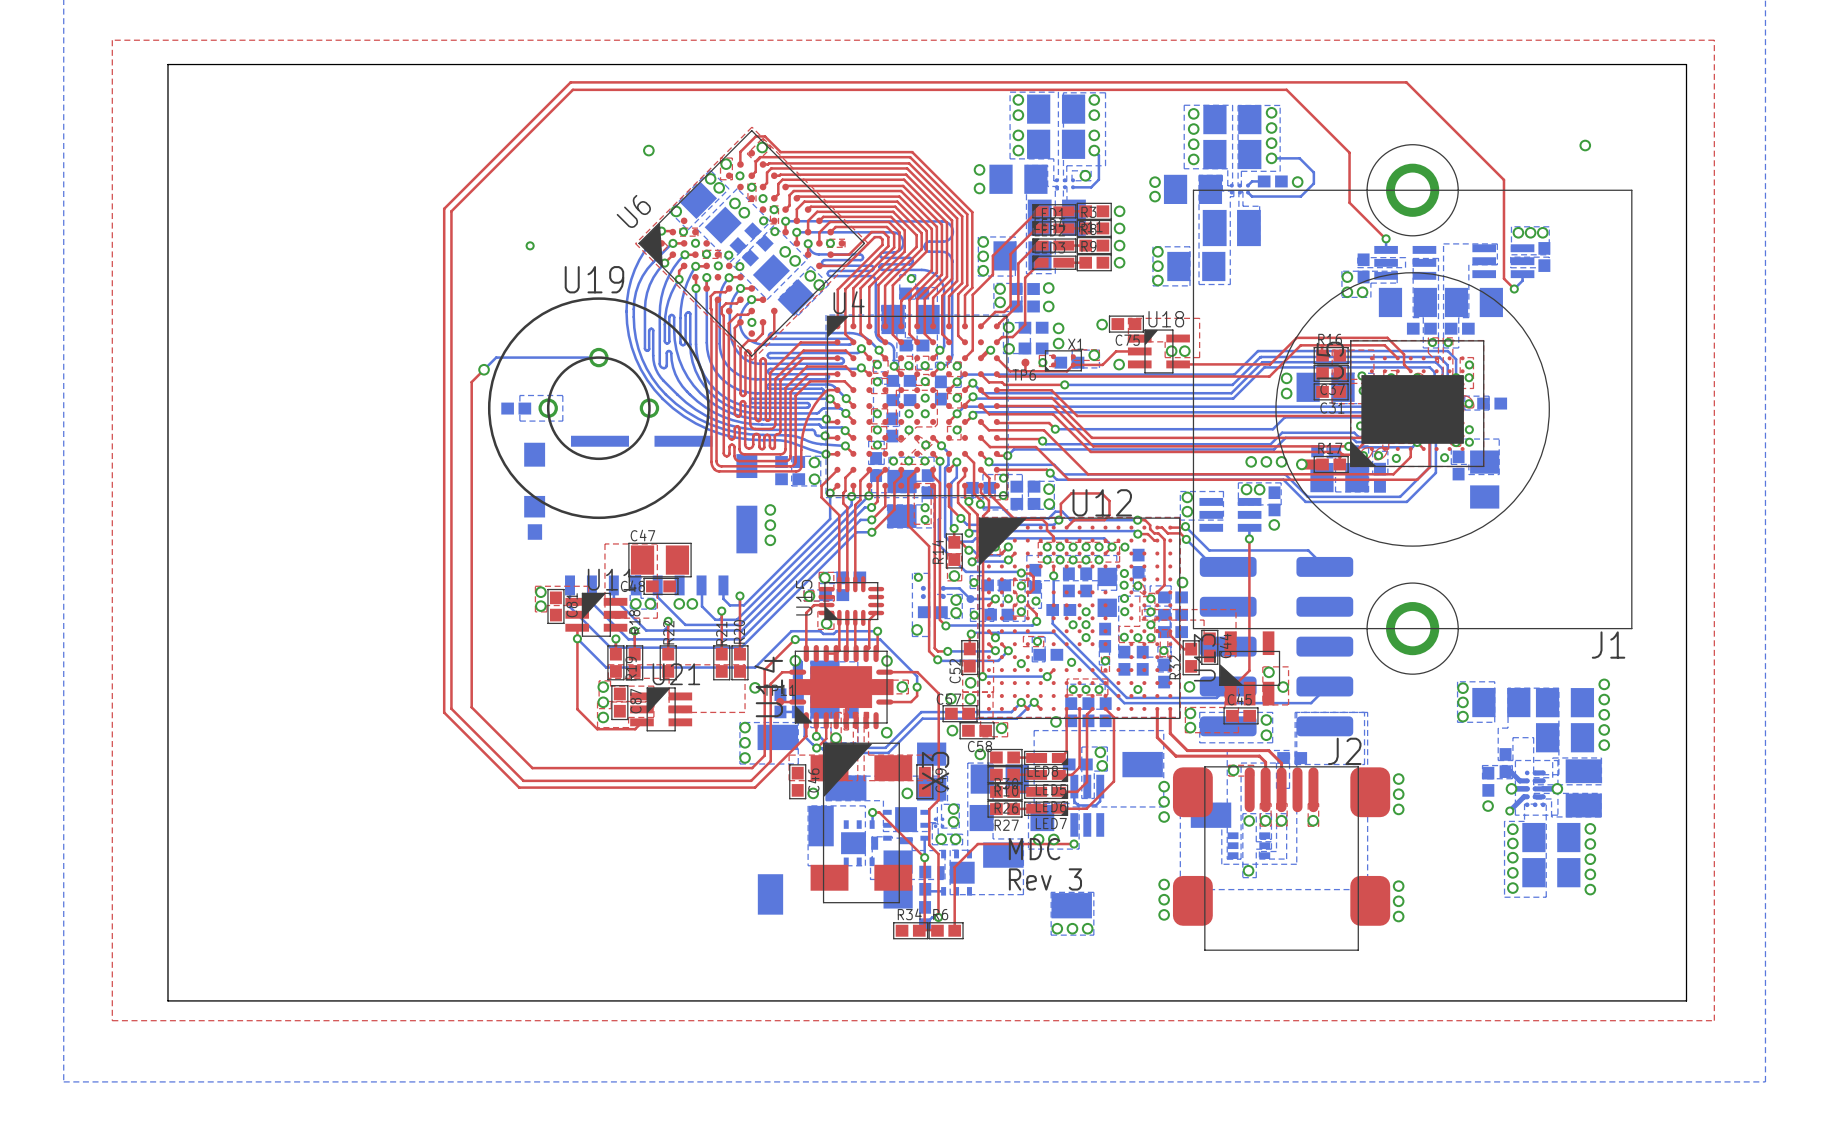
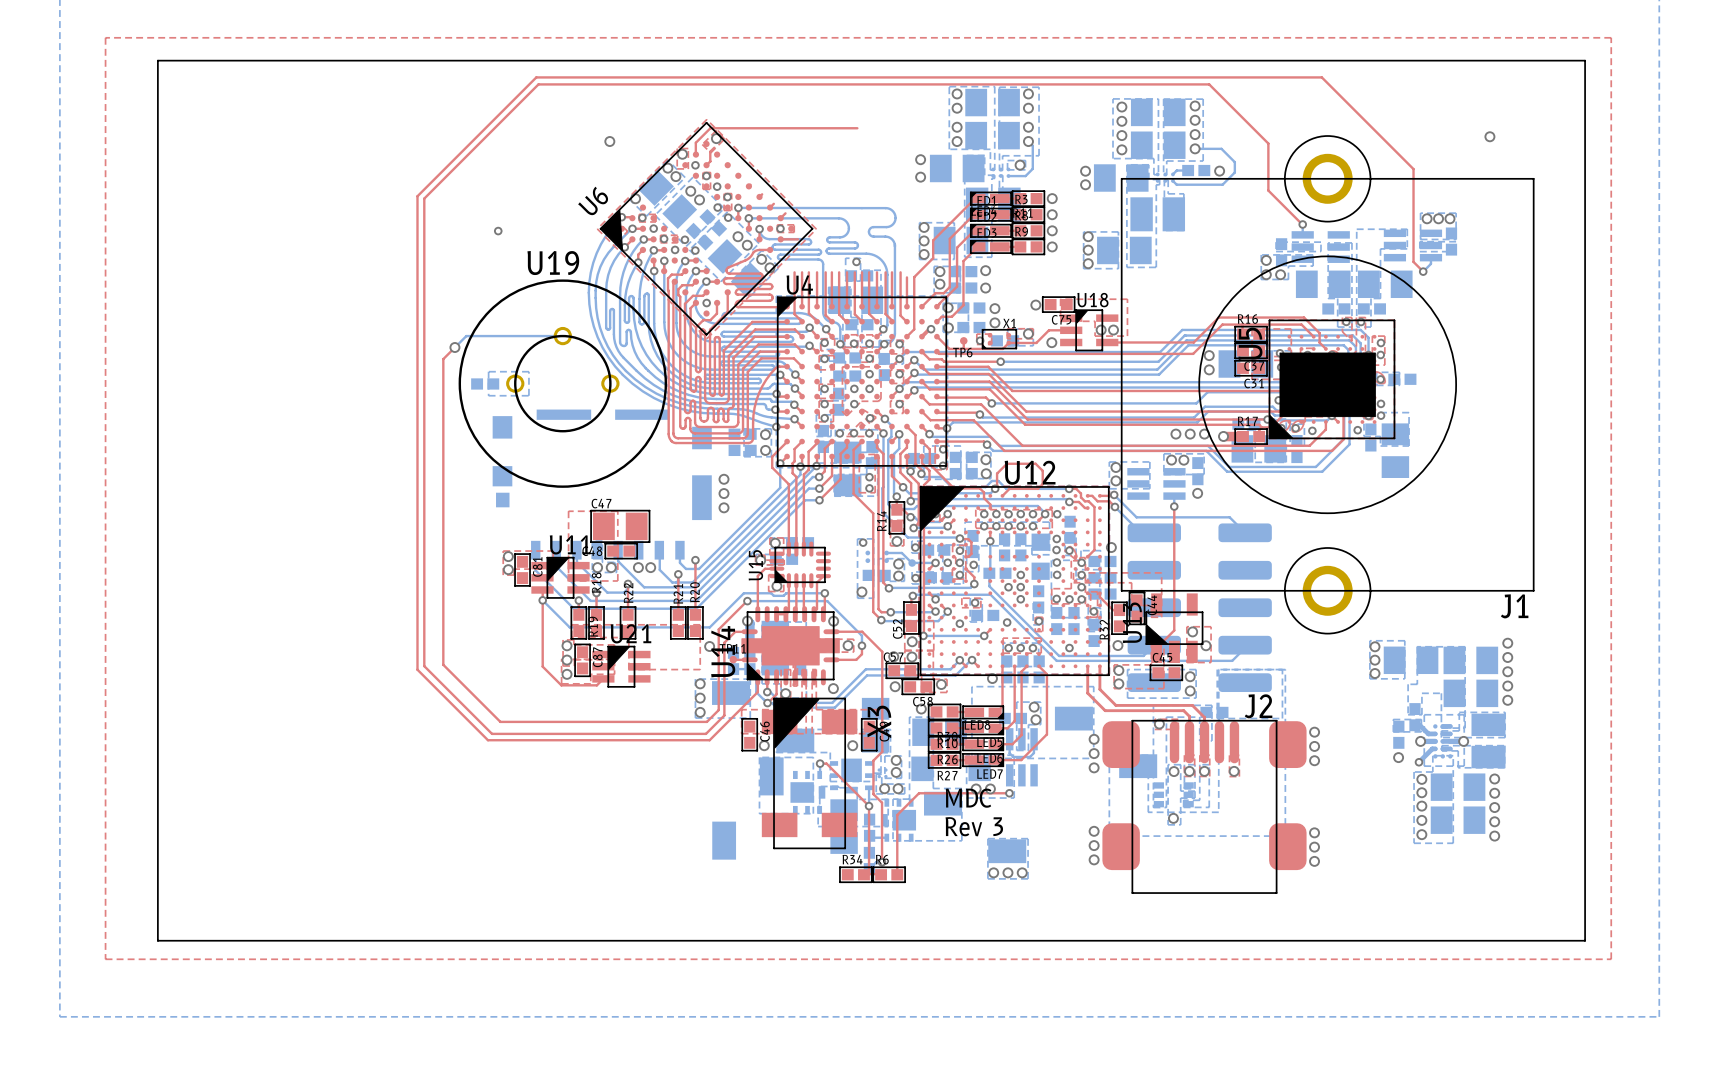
top track: (765, 136) (780, 152) (912, 152) (972, 212) (972, 287) (965, 295) -> (719, 128) (857, 128)
top track: (760, 157) (910, 157) (967, 214) (967, 285) (958, 294) -> (900, 272) (900, 276)
top track: (763, 164) (909, 163) (962, 216) (962, 283) (949, 296) -> (891, 272) (891, 278)
top track: (774, 175) (906, 174) (952, 220) (952, 278) (933, 297) -> (876, 272) (876, 279)
top track: (763, 187) (767, 183) (767, 172) (771, 168) (907, 168) (957, 218) (957, 281) (942, 295) -> (885, 272) (885, 278)
top track: (785, 187) (903, 185) (941, 224) (941, 274) (917, 299) -> (862, 272) (862, 281)
top track: (798, 196) (899, 196) (931, 228) (931, 270) (901, 301) -> (847, 272) (847, 282)
top track: (774, 198) (778, 194) (778, 184) (782, 179) (904, 179) (946, 222) (946, 276) (924, 299) -> (869, 272) (869, 281)
top track: (810, 206) (895, 206) (921, 233) (921, 249) (885, 285) (885, 289) -> none
top track: (785, 209) (789, 205) (789, 195) (793, 191) (901, 191) (936, 226) (936, 272) (909, 299) -> (854, 272) (854, 281)
top track: (823, 216) (891, 216) (904, 230) (904, 251) (869, 286) (869, 289) -> none
top track: (796, 220) (796, 209) (804, 201) (897, 201) (926, 231) (926, 251) (892, 285) (892, 289) -> none
top track: (835, 227) (886, 227) (894, 234) (894, 247) (853, 289) -> none
top track: (808, 232) (808, 220) (817, 211) (893, 211) (916, 235) (916, 246) (878, 285) (878, 289) -> none
top track: (819, 243) (819, 232) (830, 221) (888, 221) (899, 232) (899, 249) (860, 289) -> none
top track: (849, 254) (871, 232) (883, 232) (888, 237) (888, 246) (845, 289) -> none
top track: (819, 265) (845, 265) (874, 237) (880, 237) (882, 239) (882, 244) (837, 289) (837, 326) -> (770, 249) (756, 250) (747, 259) (726, 269) (729, 273) (760, 273) (761, 277) (726, 278) (723, 281) (726, 284) (771, 285) (770, 289) (737, 289) (735, 292) (737, 294) (770, 294) (772, 297) (769, 300) (738, 300) (735, 303) (737, 306) (787, 306)

